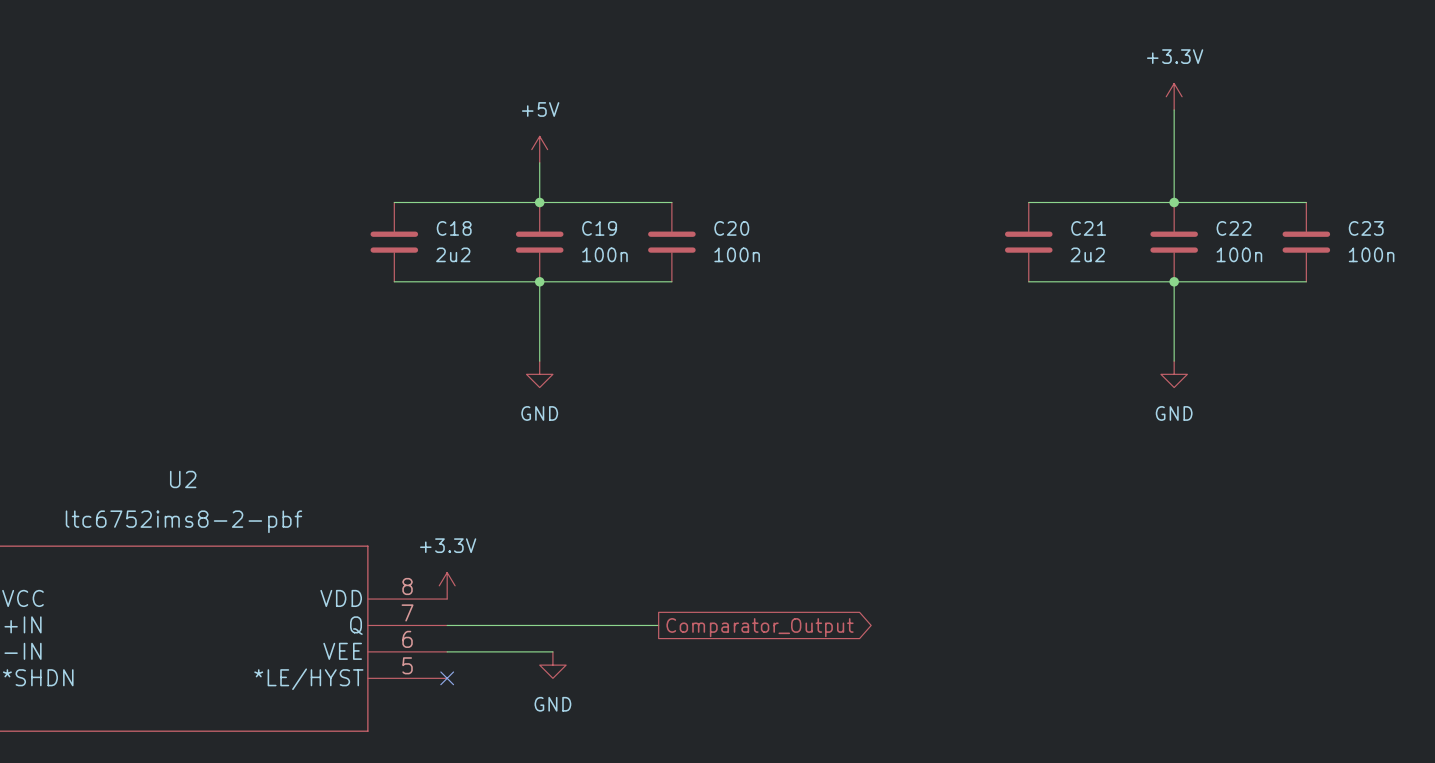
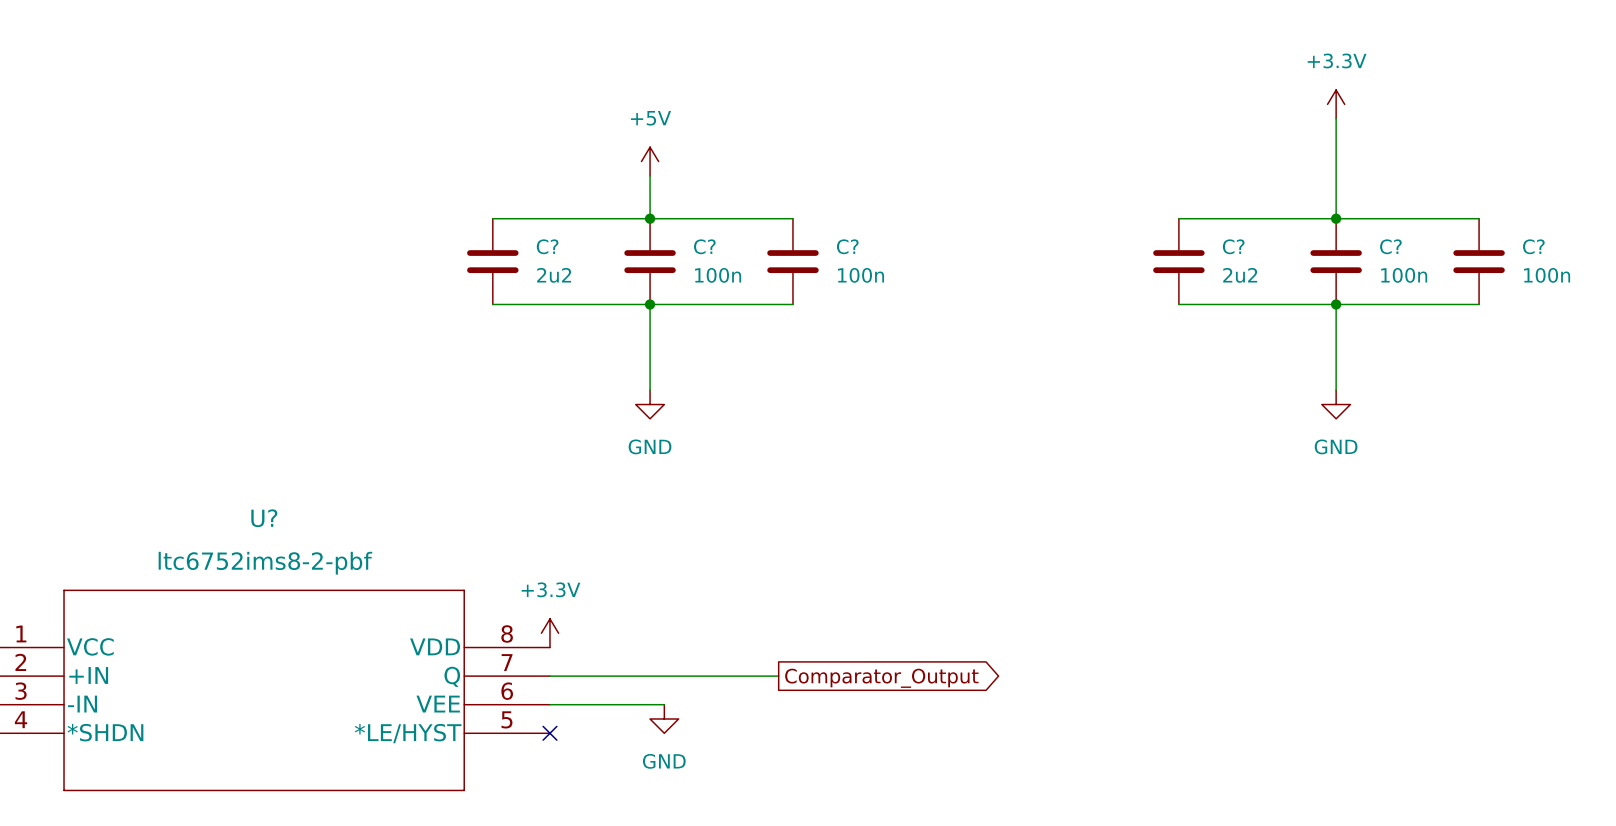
C18 name: C18 (454, 228) -> C? (547, 246)
C19 name: C19 (599, 228) -> C? (704, 246)
C20 name: C20 (731, 228) -> C? (847, 246)
C21 name: C21 (1088, 228) -> C? (1233, 246)
C22 name: C22 (1234, 228) -> C? (1390, 246)
C23 name: C23 (1366, 228) -> C? (1533, 246)
U2 name: U2 (183, 479) -> U? (264, 518)

